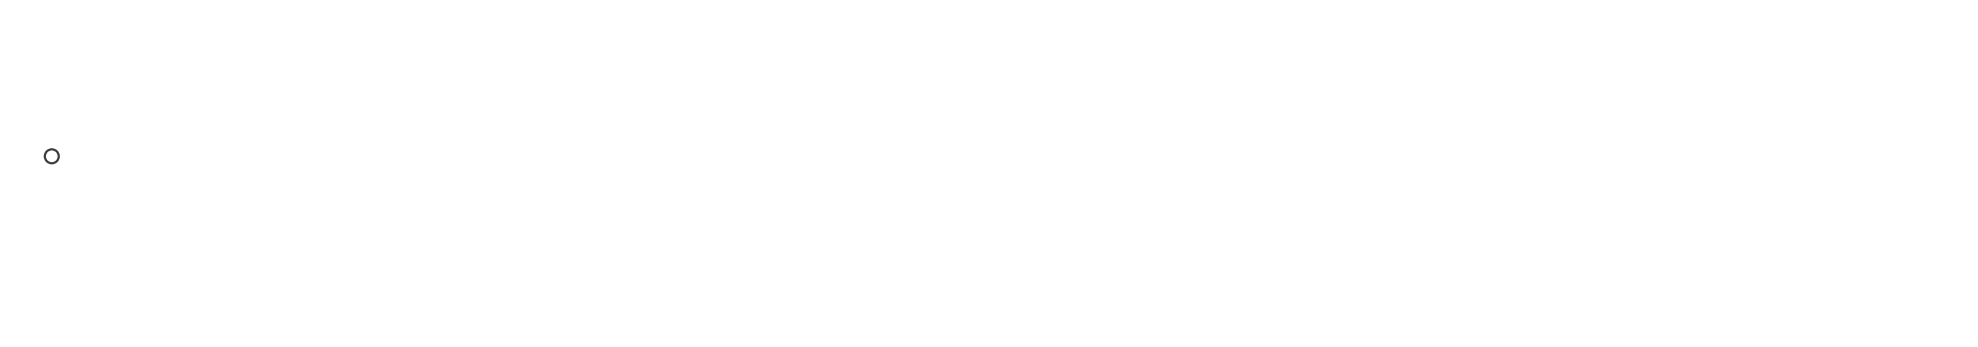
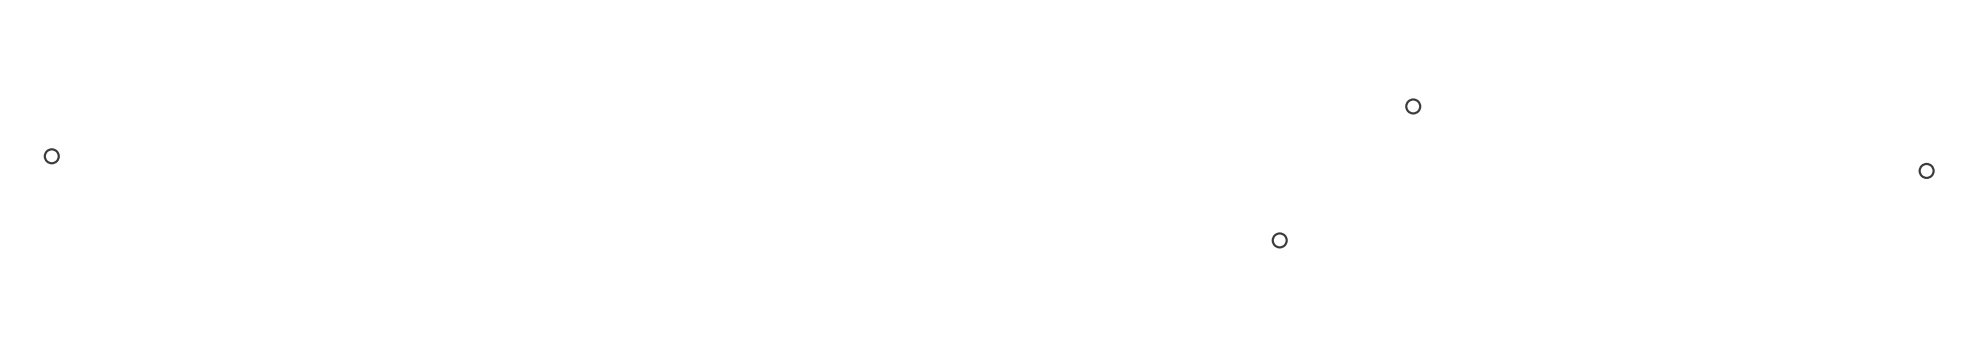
part: none -> (1413, 106)
part: none -> (1926, 170)
part: none -> (1279, 240)

